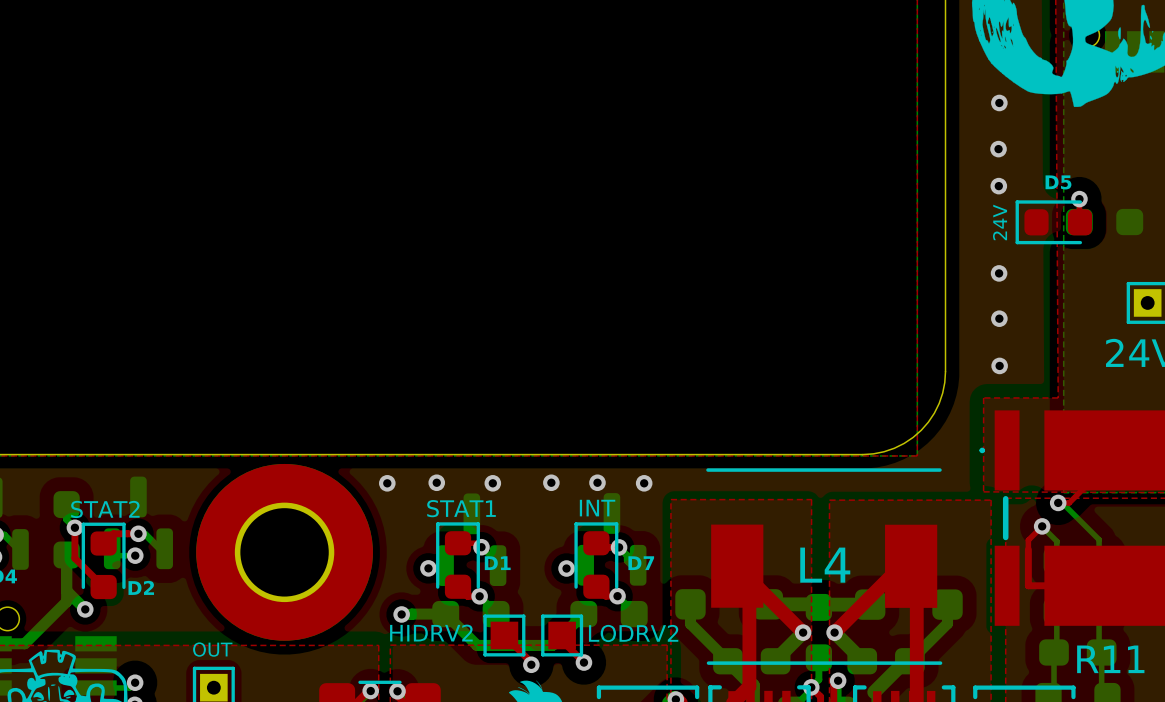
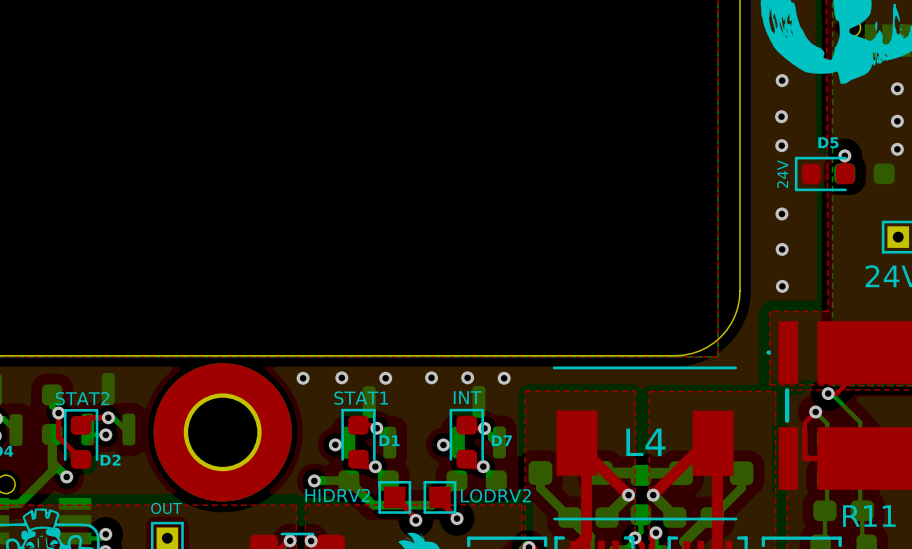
via: none -> (897, 88)
via: none -> (897, 121)
via: none -> (897, 149)

